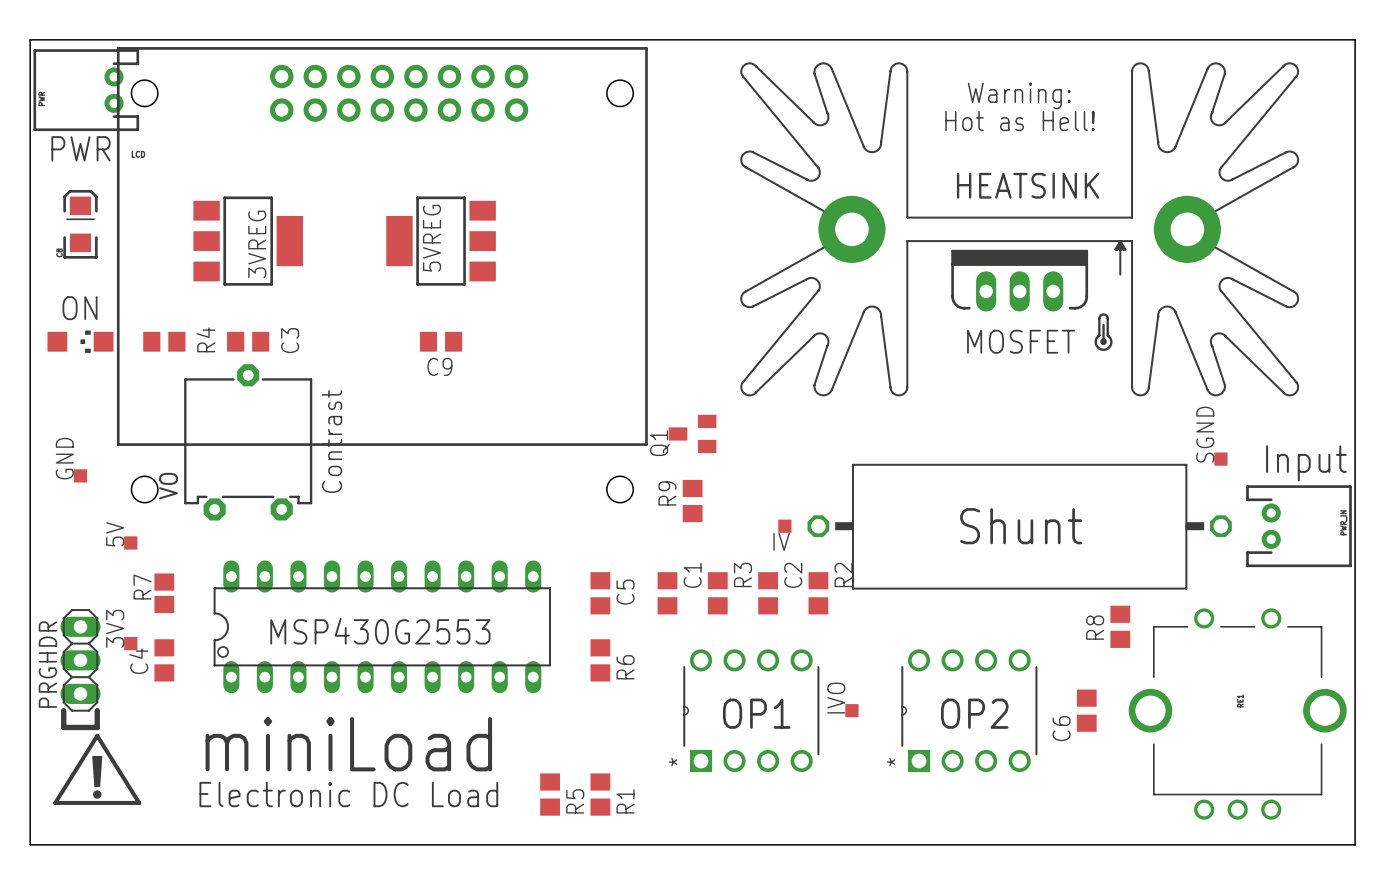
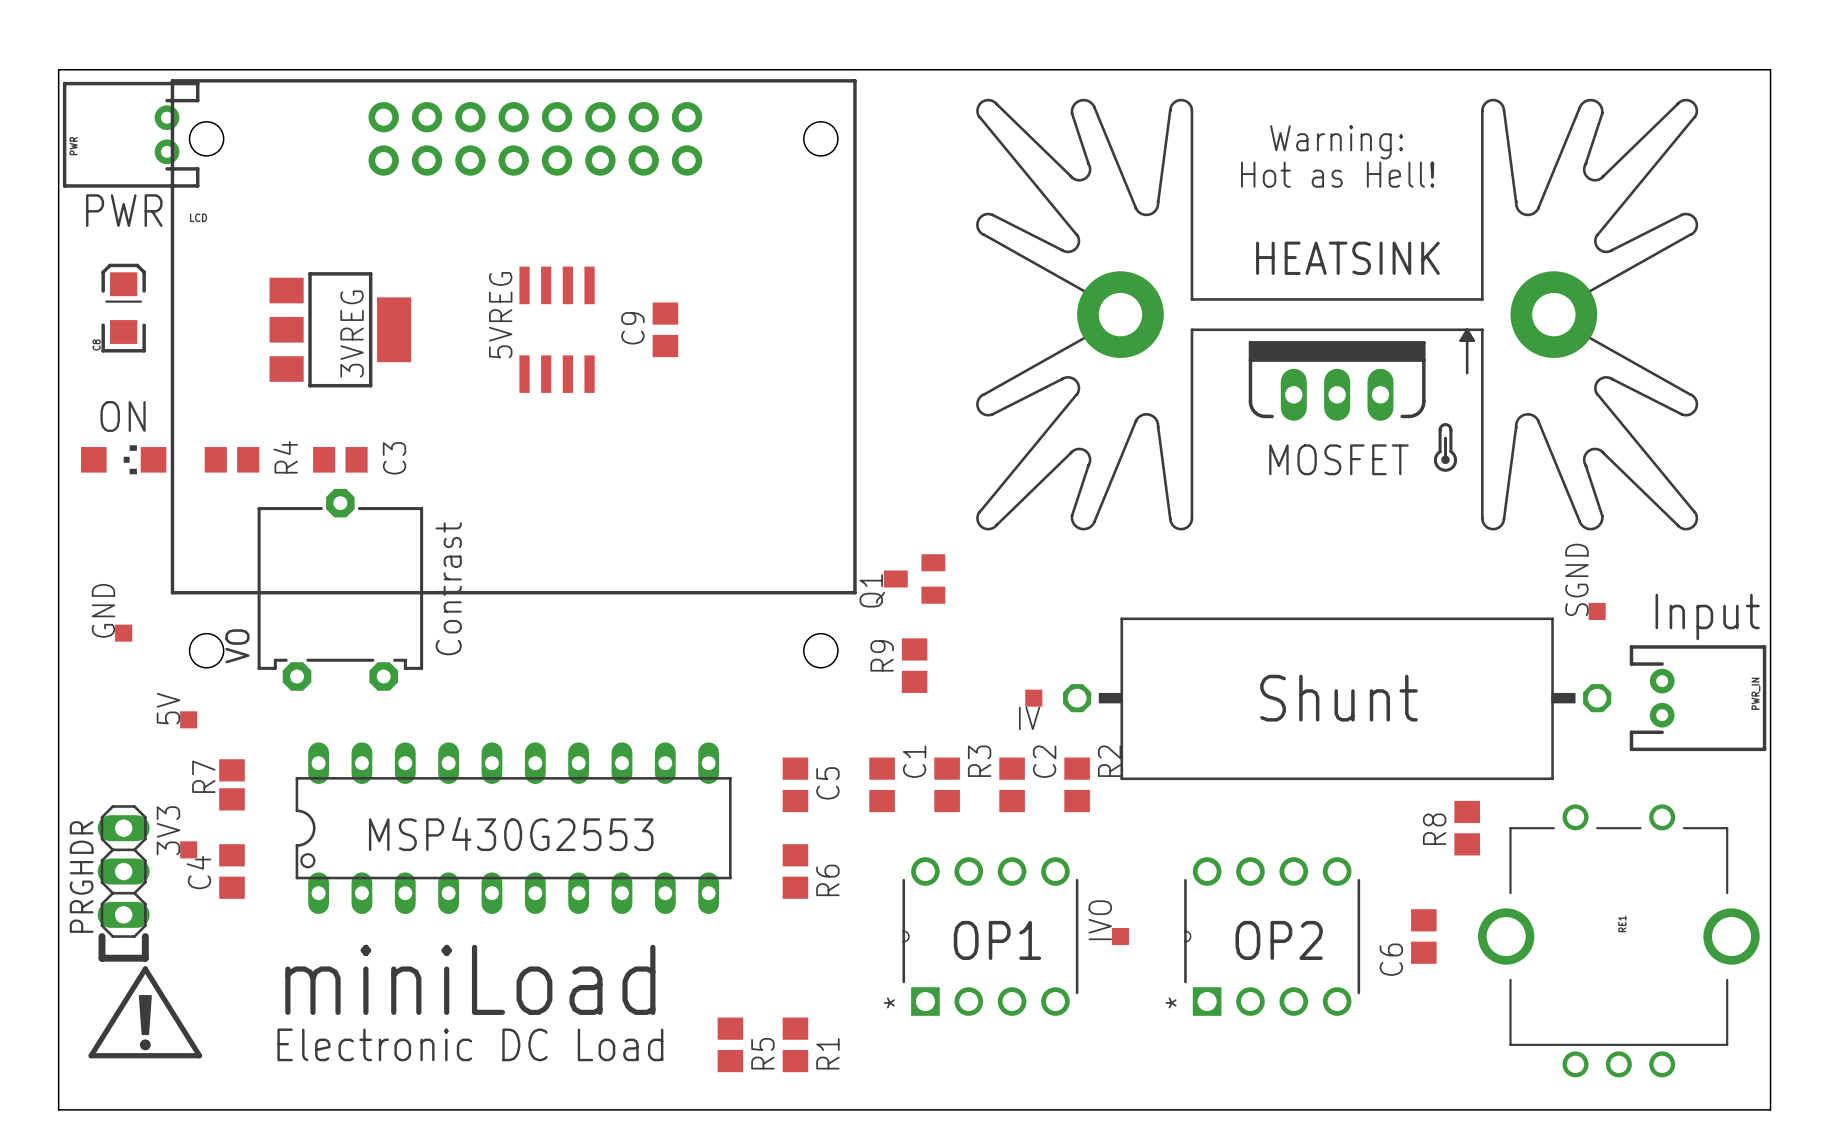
5VREG footprint: [386, 196, 496, 286] -> [519, 266, 595, 393]
5VREG name position: 5VREG (432, 238) -> 5VREG (500, 315)
C9 rotation: 0° (441, 341) -> 90° clockwise (665, 329)
C9 position: (441, 341) -> (665, 329)

